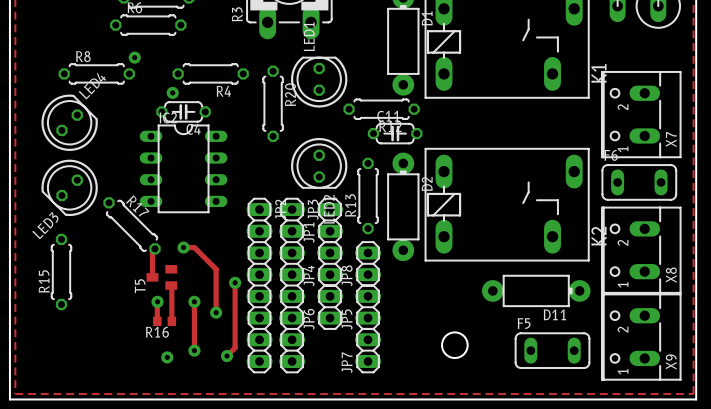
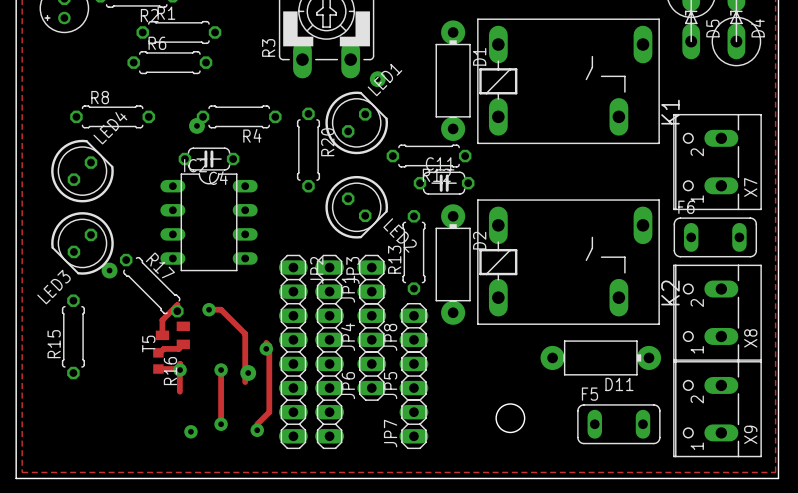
via: none -> (377, 79)
via: (134, 57) -> none
via: none -> (196, 125)
LED1 rotation: 0° (319, 82) -> 45° clockwise (356, 122)
via: (172, 92) -> none
LED2 rotation: 0° (319, 163) -> 45° counterclockwise (356, 207)
via: none -> (109, 270)
track: none -> (177, 305) (162, 320) (162, 335)
track: (155, 248) (152, 251) (152, 277) -> none
T5 position: (161, 277) -> (172, 335)
track: none -> (266, 342) (269, 345) (269, 412) (257, 424)
track: none -> (183, 344) (178, 348) (163, 348) (158, 352)
track: (235, 282) (235, 347) (226, 356) -> none
track: (171, 285) (171, 321) -> none
track: none -> (179, 364) (180, 369) (158, 369)
via: none -> (248, 373)
via: (216, 312) -> none
R16 rotation: 0° (164, 321) -> 90° clockwise (158, 360)
R16 position: (164, 321) -> (158, 360)
R16 name position: R16 (157, 332) -> R16 (170, 371)

